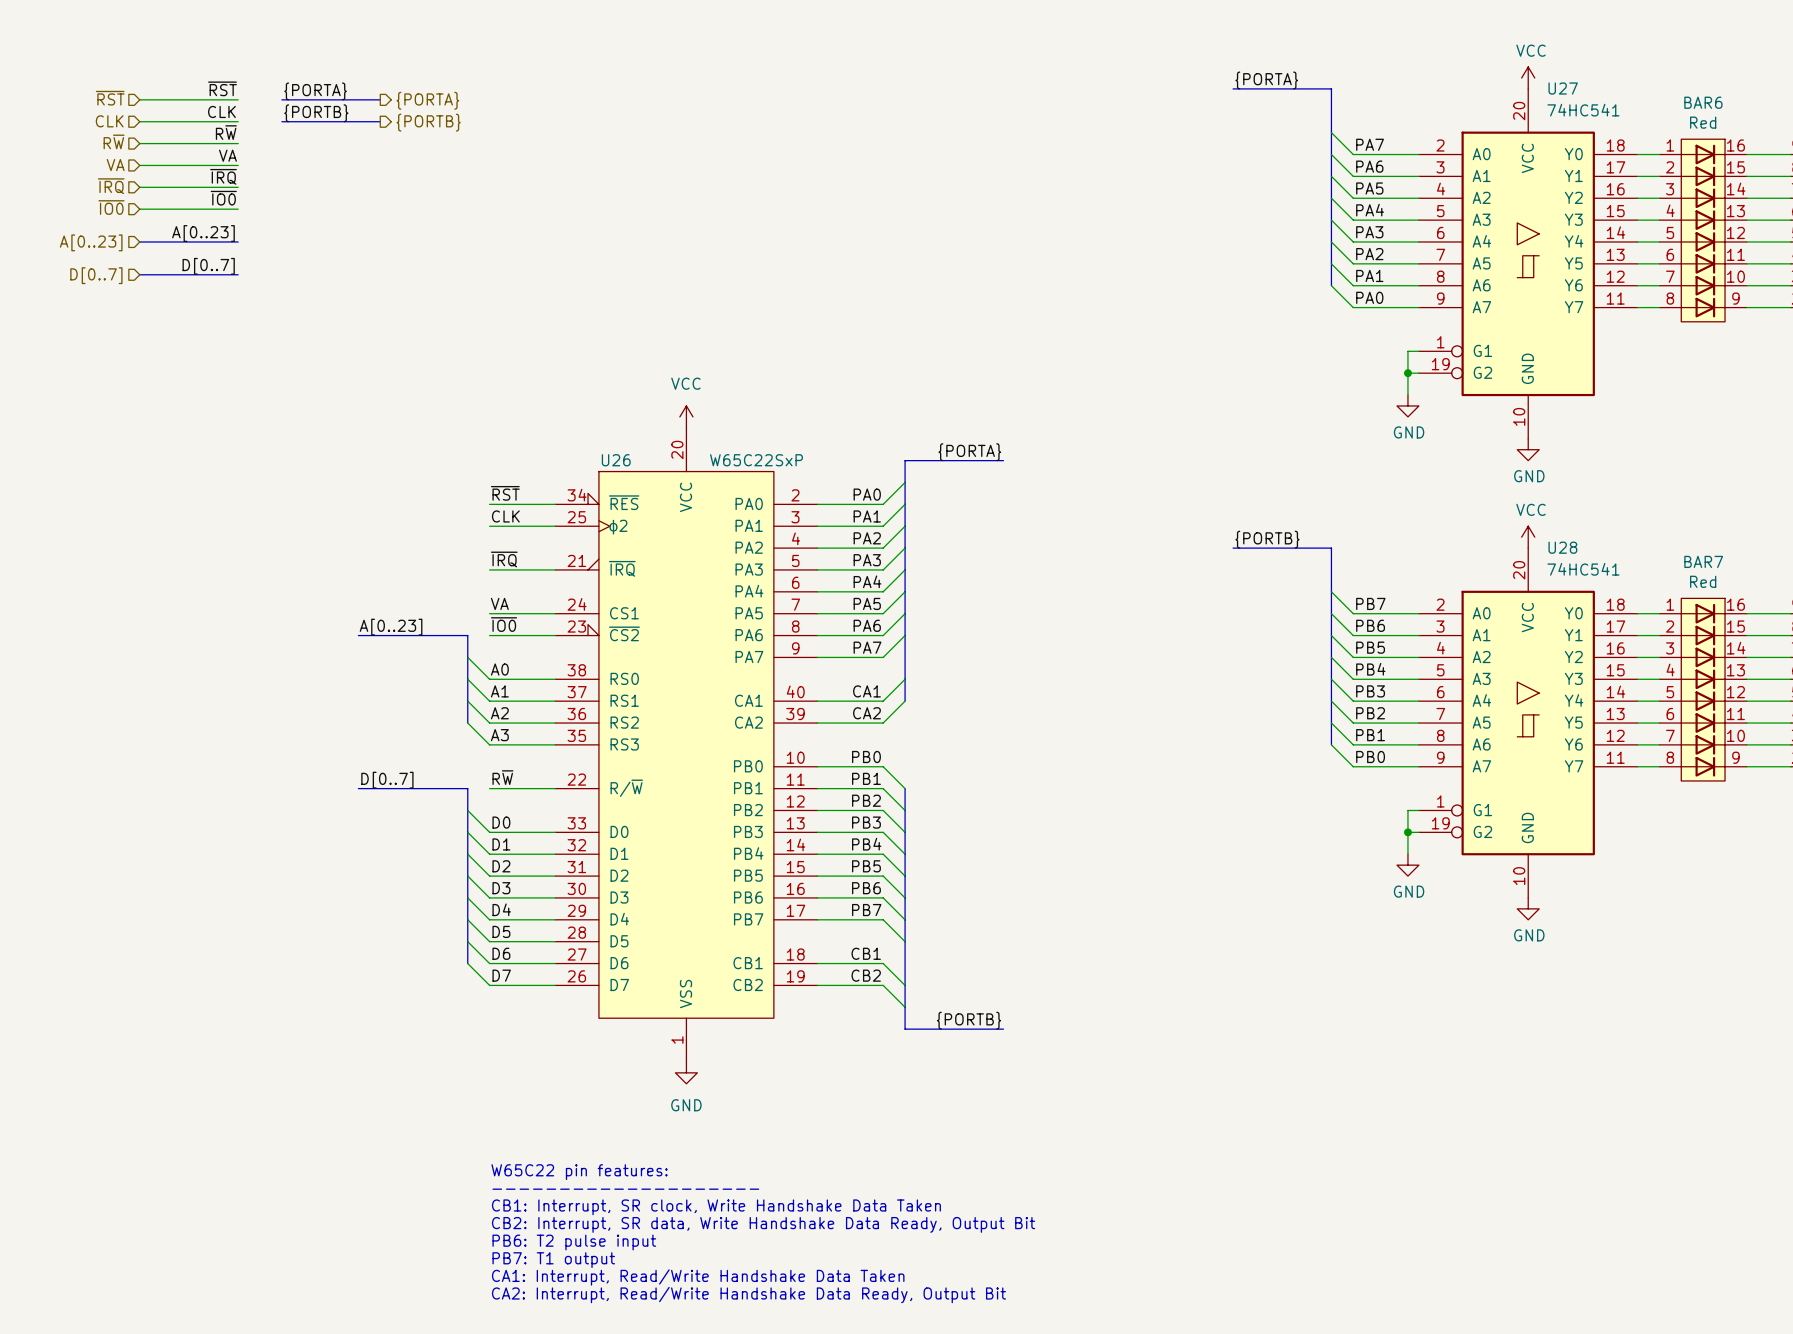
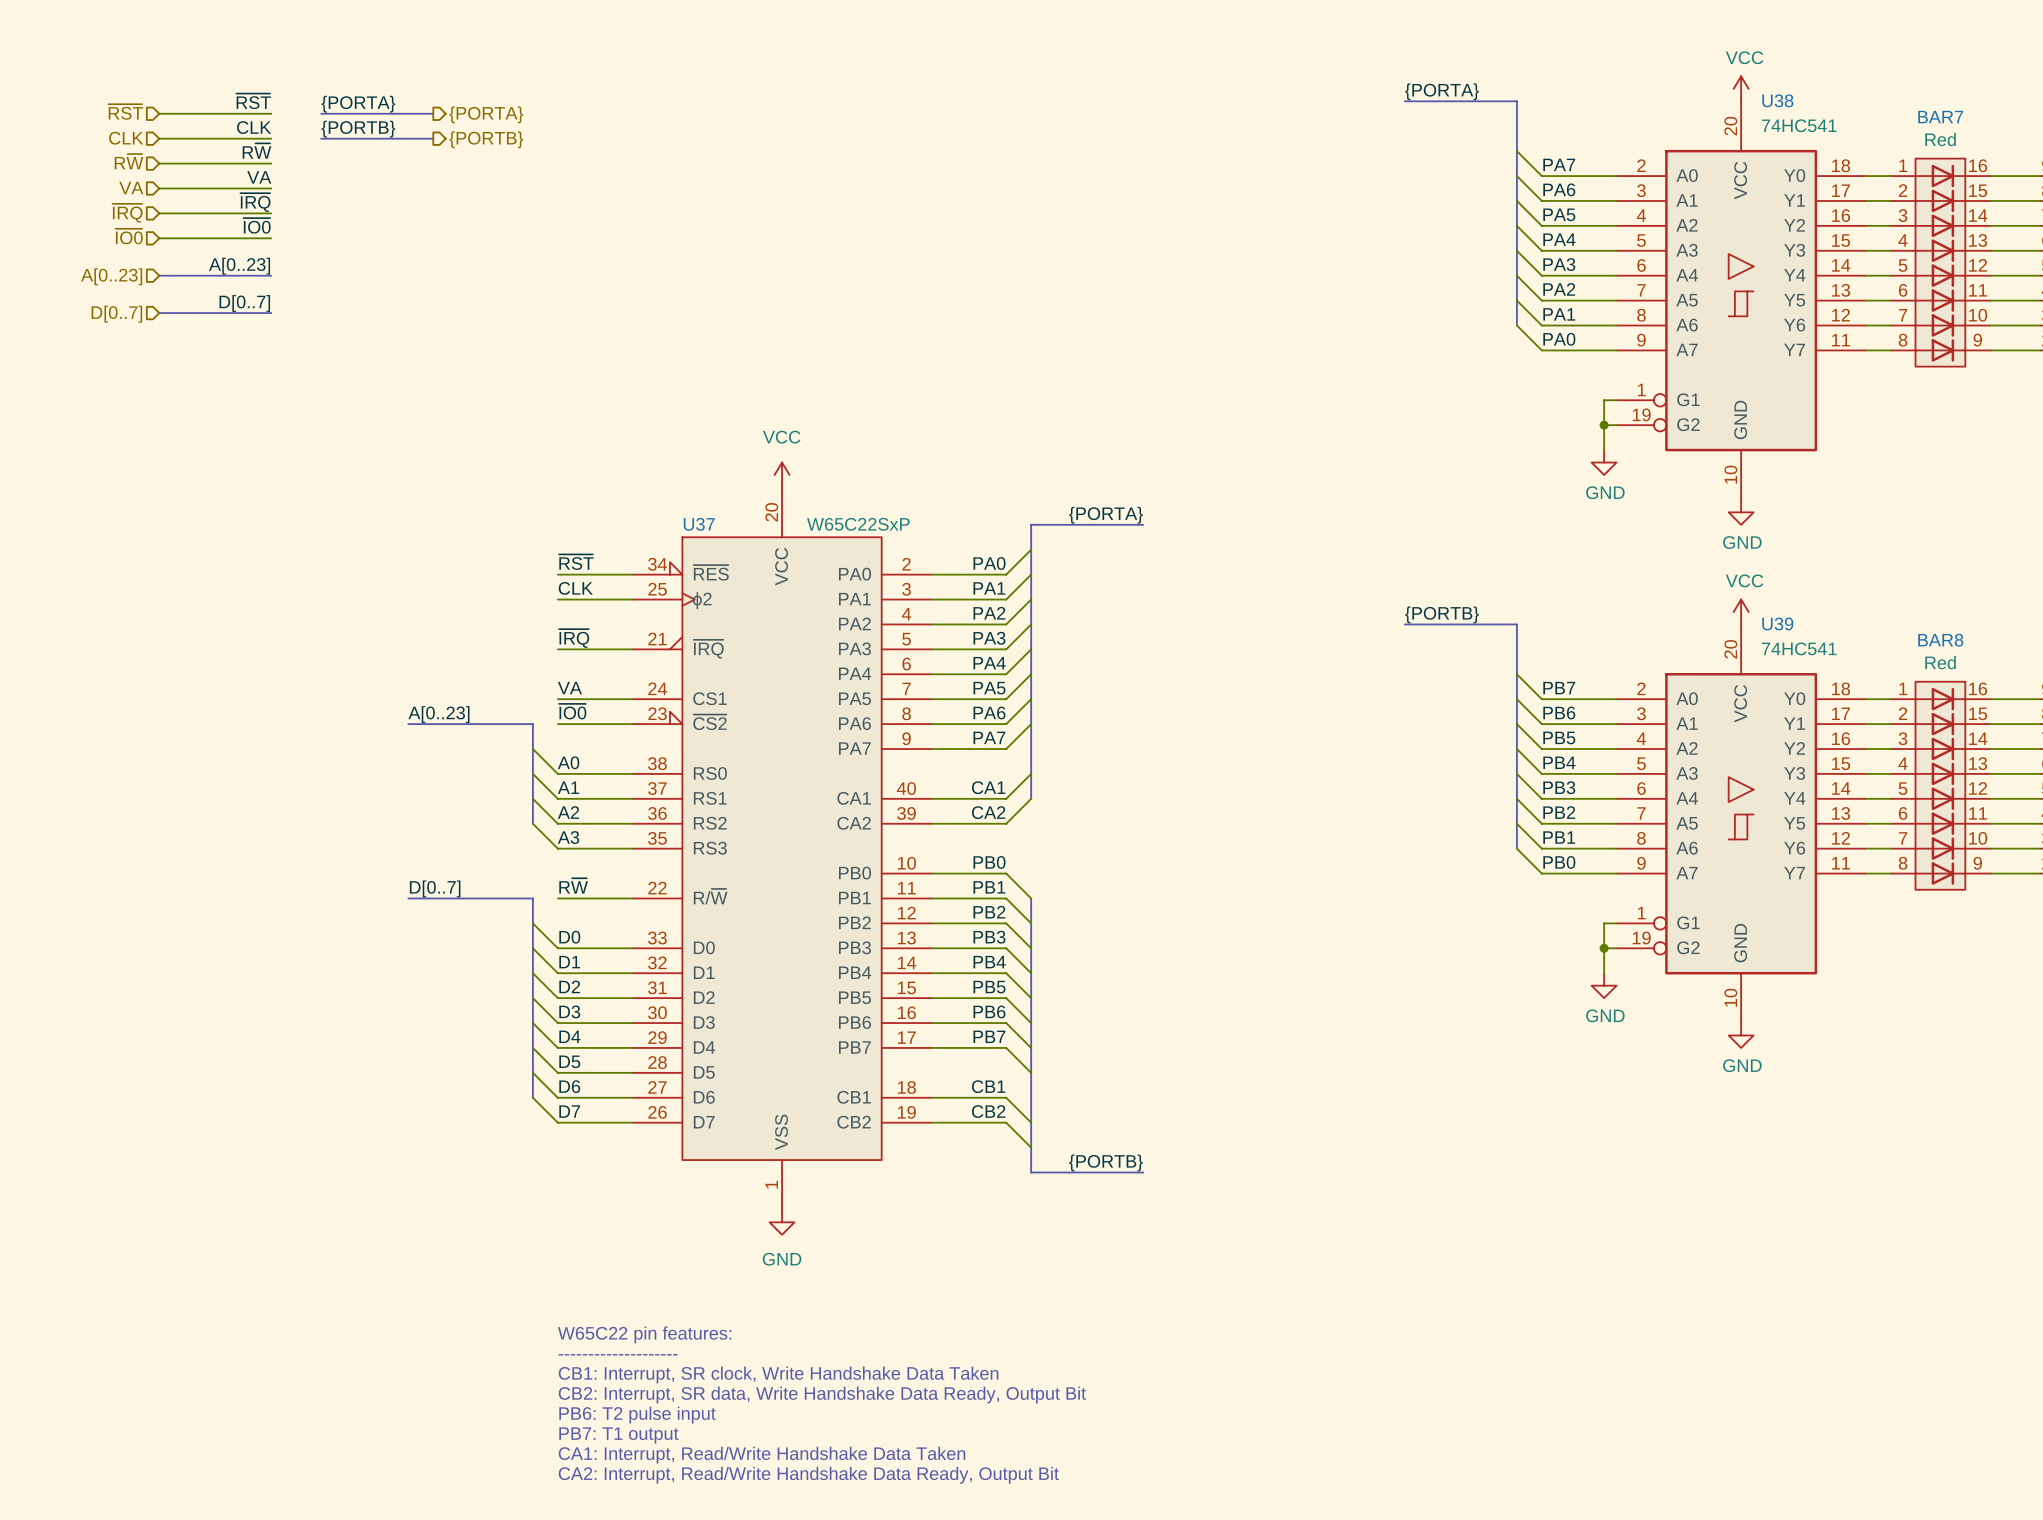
U27 name: U27 (1563, 88) -> U38 (1777, 100)
BAR6 name: BAR6 (1703, 102) -> BAR7 (1940, 117)
U26 name: U26 (616, 460) -> U37 (699, 524)
U28 name: U28 (1562, 547) -> U39 (1777, 623)
BAR7 name: BAR7 (1703, 561) -> BAR8 (1940, 640)

